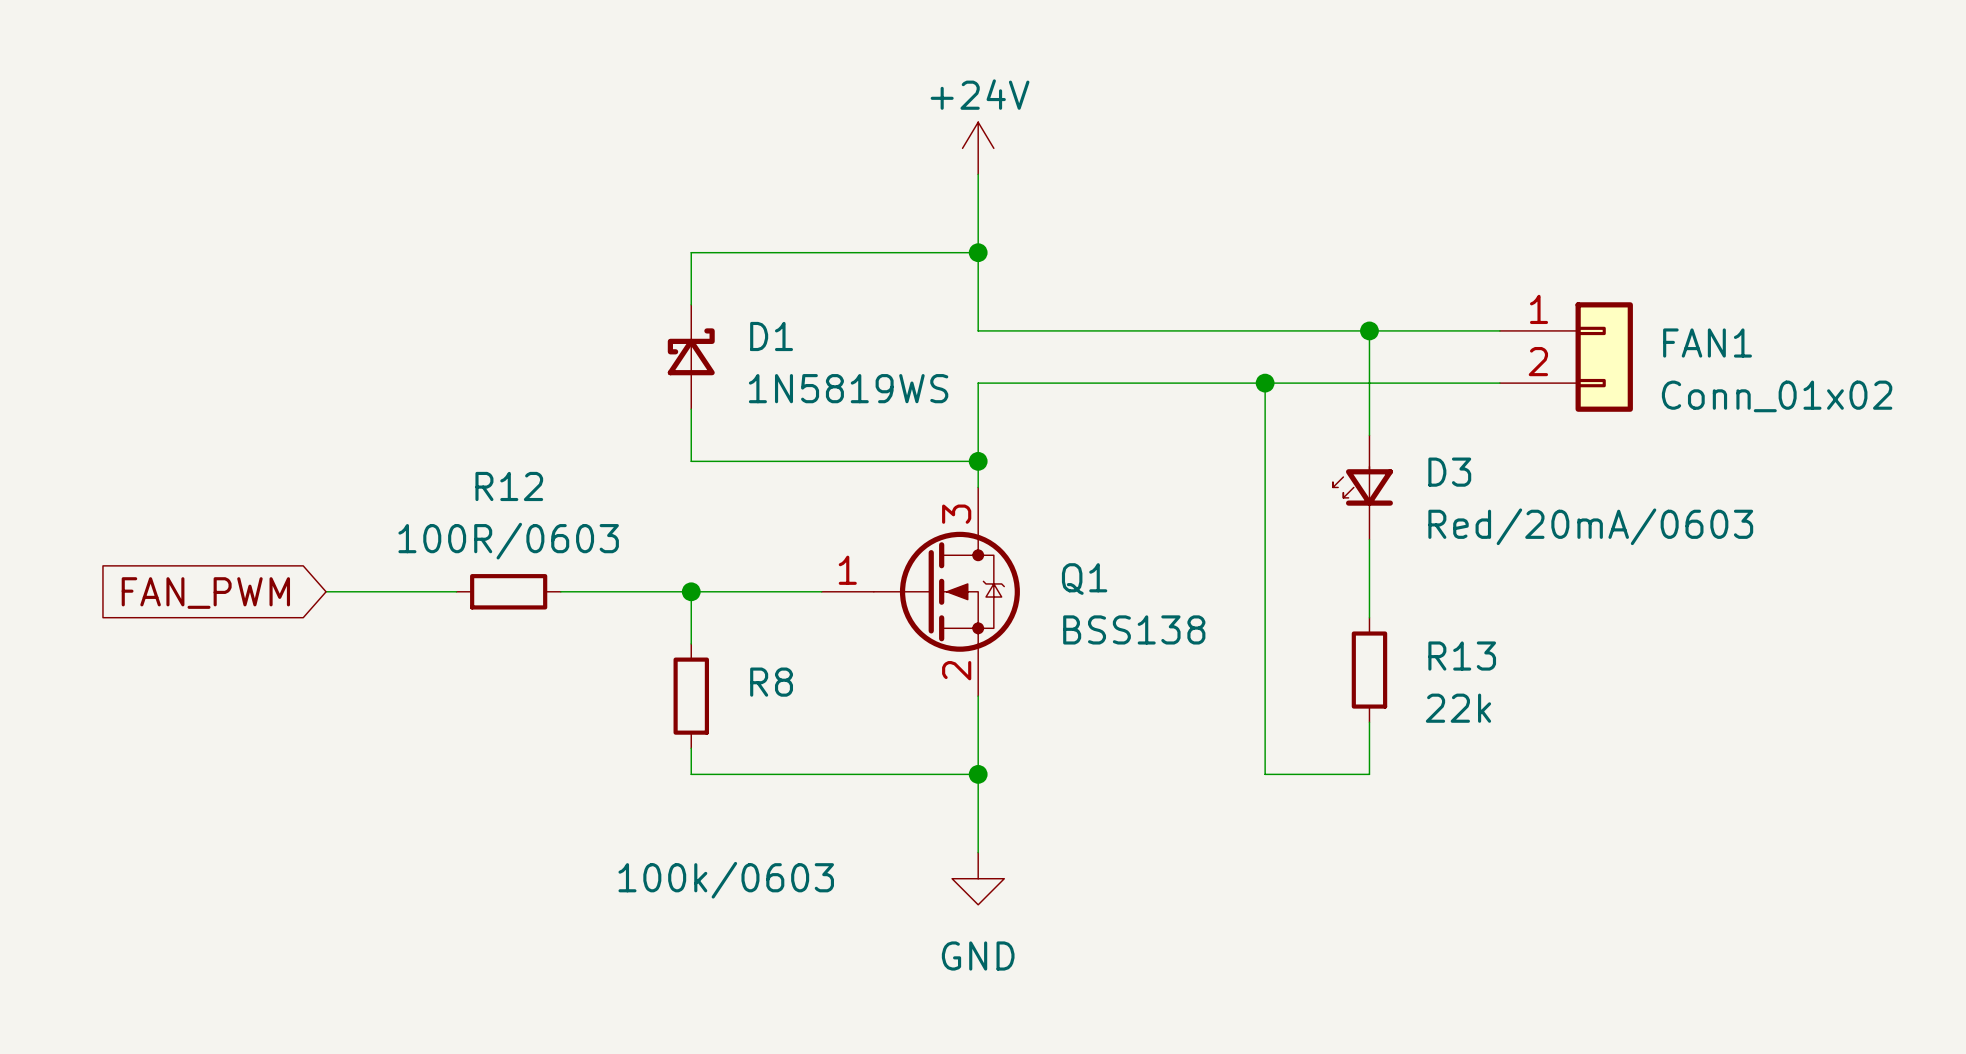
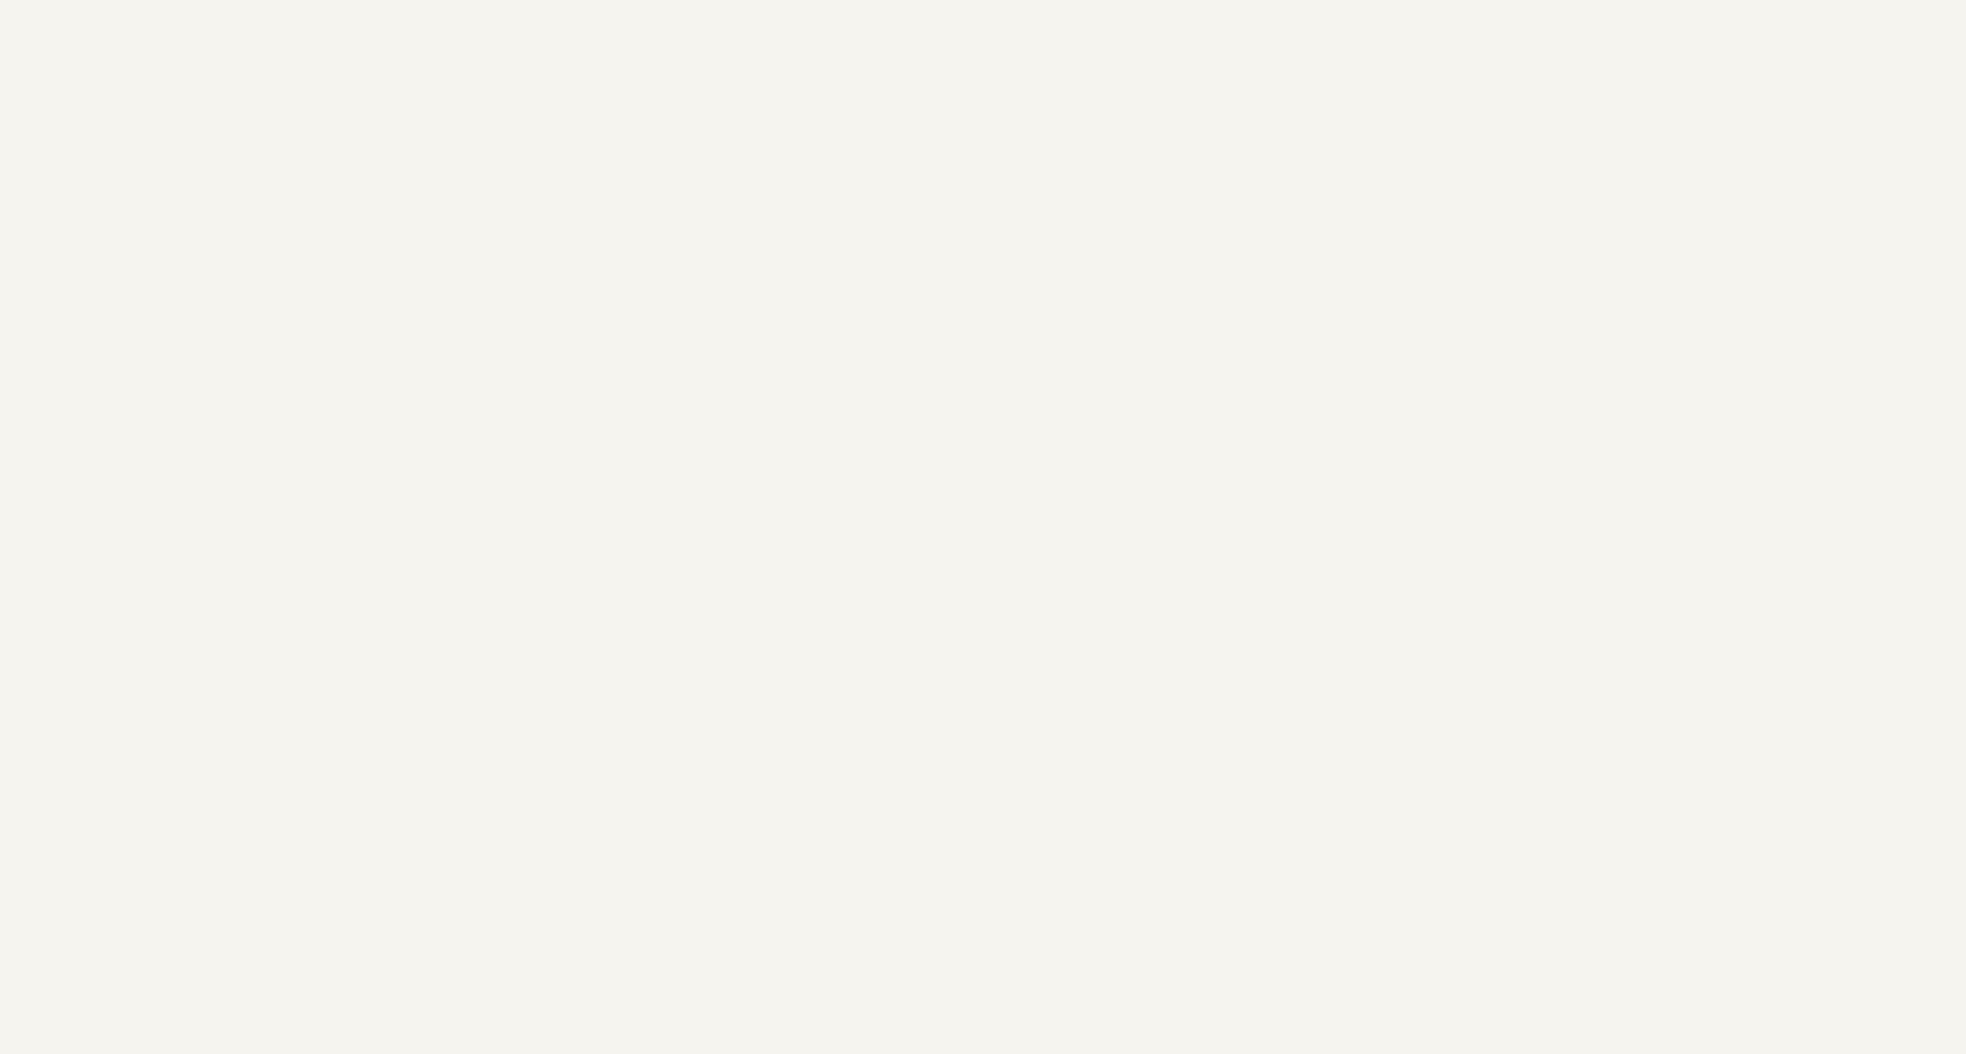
power symbol: +24V (978, 148) -> none
wire: (978, 174) (978, 330) (1499, 330) -> none
wire: (978, 252) (691, 252) (691, 304) -> none
junction: (978, 252) -> none
wire: (1369, 330) (1369, 435) -> none
junction: (1369, 330) -> none
D1: 1N5819WS (691, 357) -> none
FAN1: Conn_01x02 (1566, 357) -> none
wire: (1265, 383) (1265, 774) (1369, 774) (1369, 722) -> none
junction: (1265, 383) -> none
wire: (1499, 383) (978, 383) (978, 487) -> none
wire: (691, 409) (691, 461) (978, 461) -> none
junction: (978, 461) -> none
D3: Red/20mA/0603 (1362, 487) -> none
wire: (1369, 539) (1369, 617) -> none
wire: (326, 591) (456, 591) -> none
R12: 100R/0603 (508, 591) -> none
wire: (560, 591) (821, 591) -> none
wire: (691, 591) (691, 643) -> none
junction: (691, 591) -> none
Q1: BSS138 (920, 591) -> none
global label: FAN_PWM (205, 593) -> none
R13: 22k (1369, 670) -> none
R8: 100k/0603 (691, 696) -> none
wire: (978, 696) (978, 852) -> none
wire: (691, 748) (691, 774) (978, 774) -> none
junction: (978, 774) -> none
power symbol: GND (978, 878) -> none

